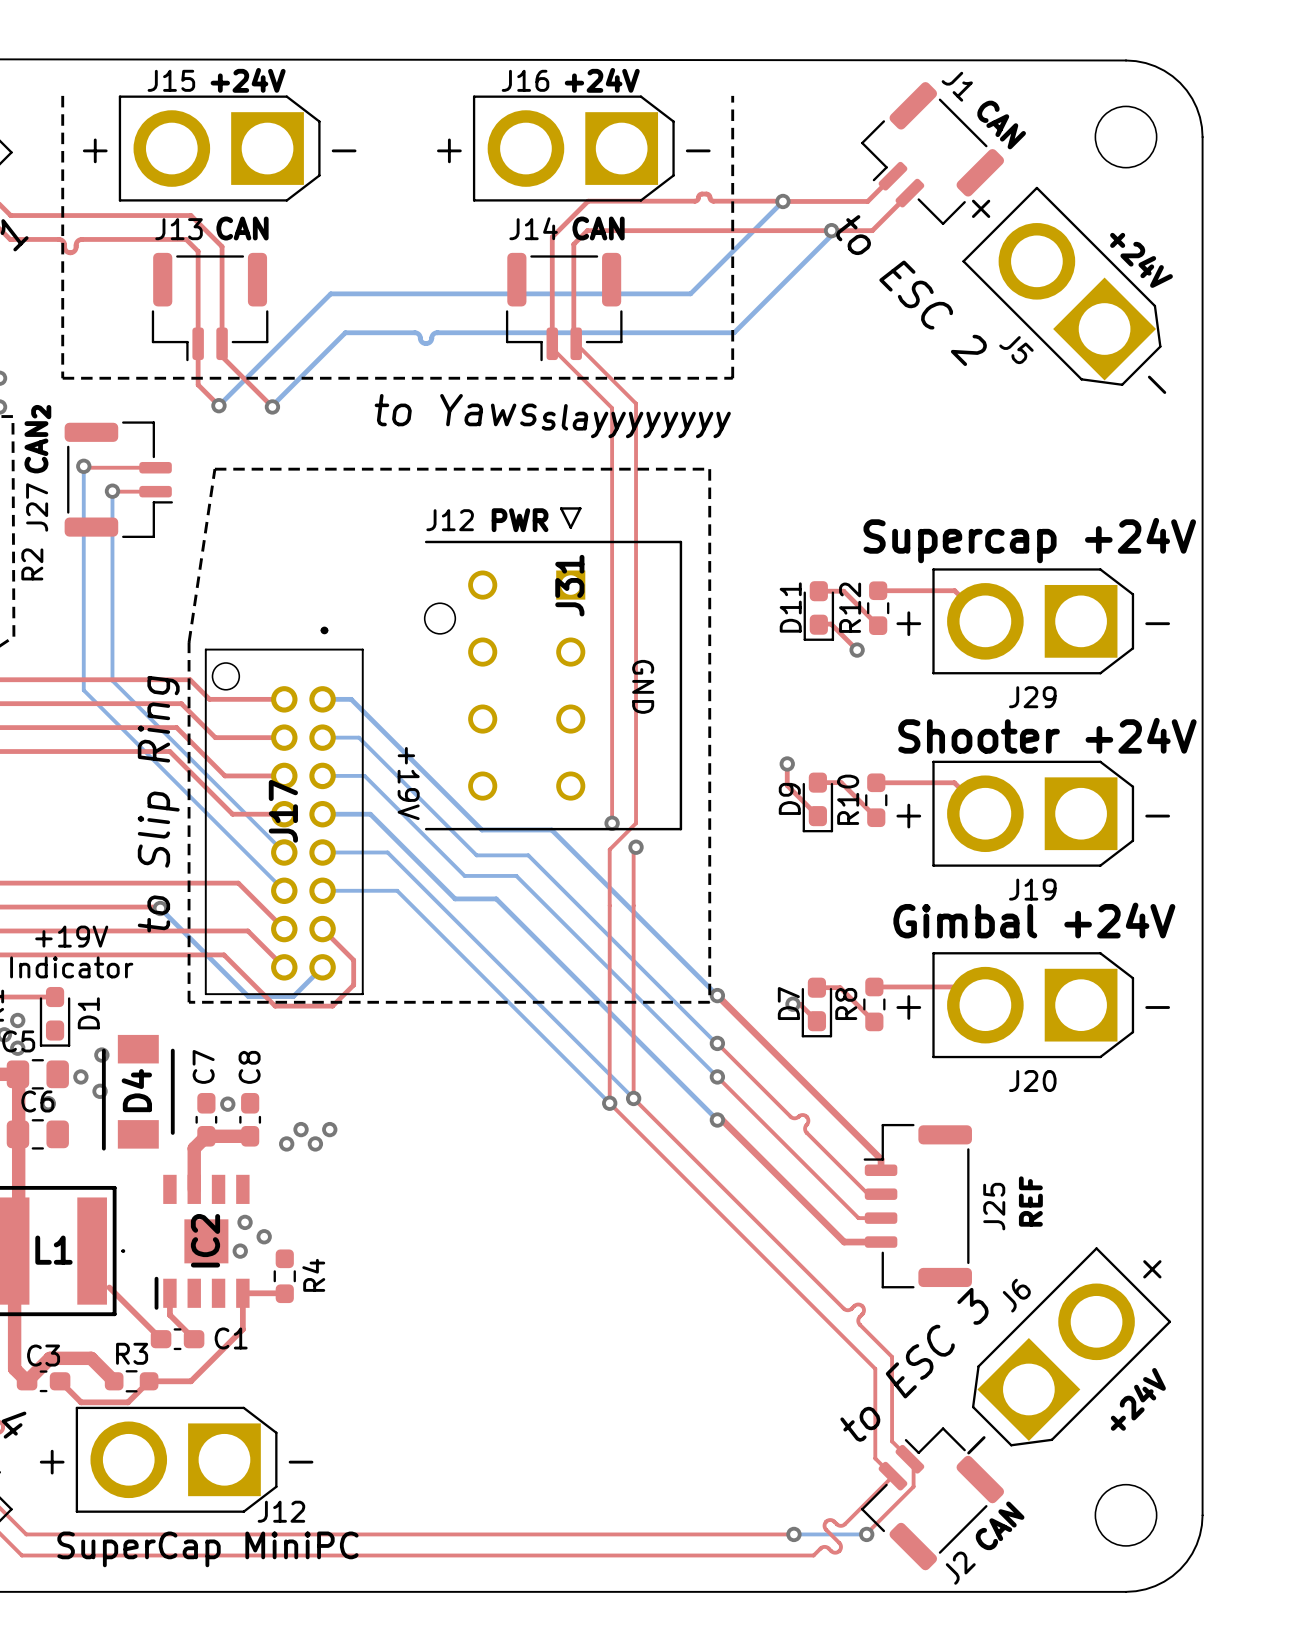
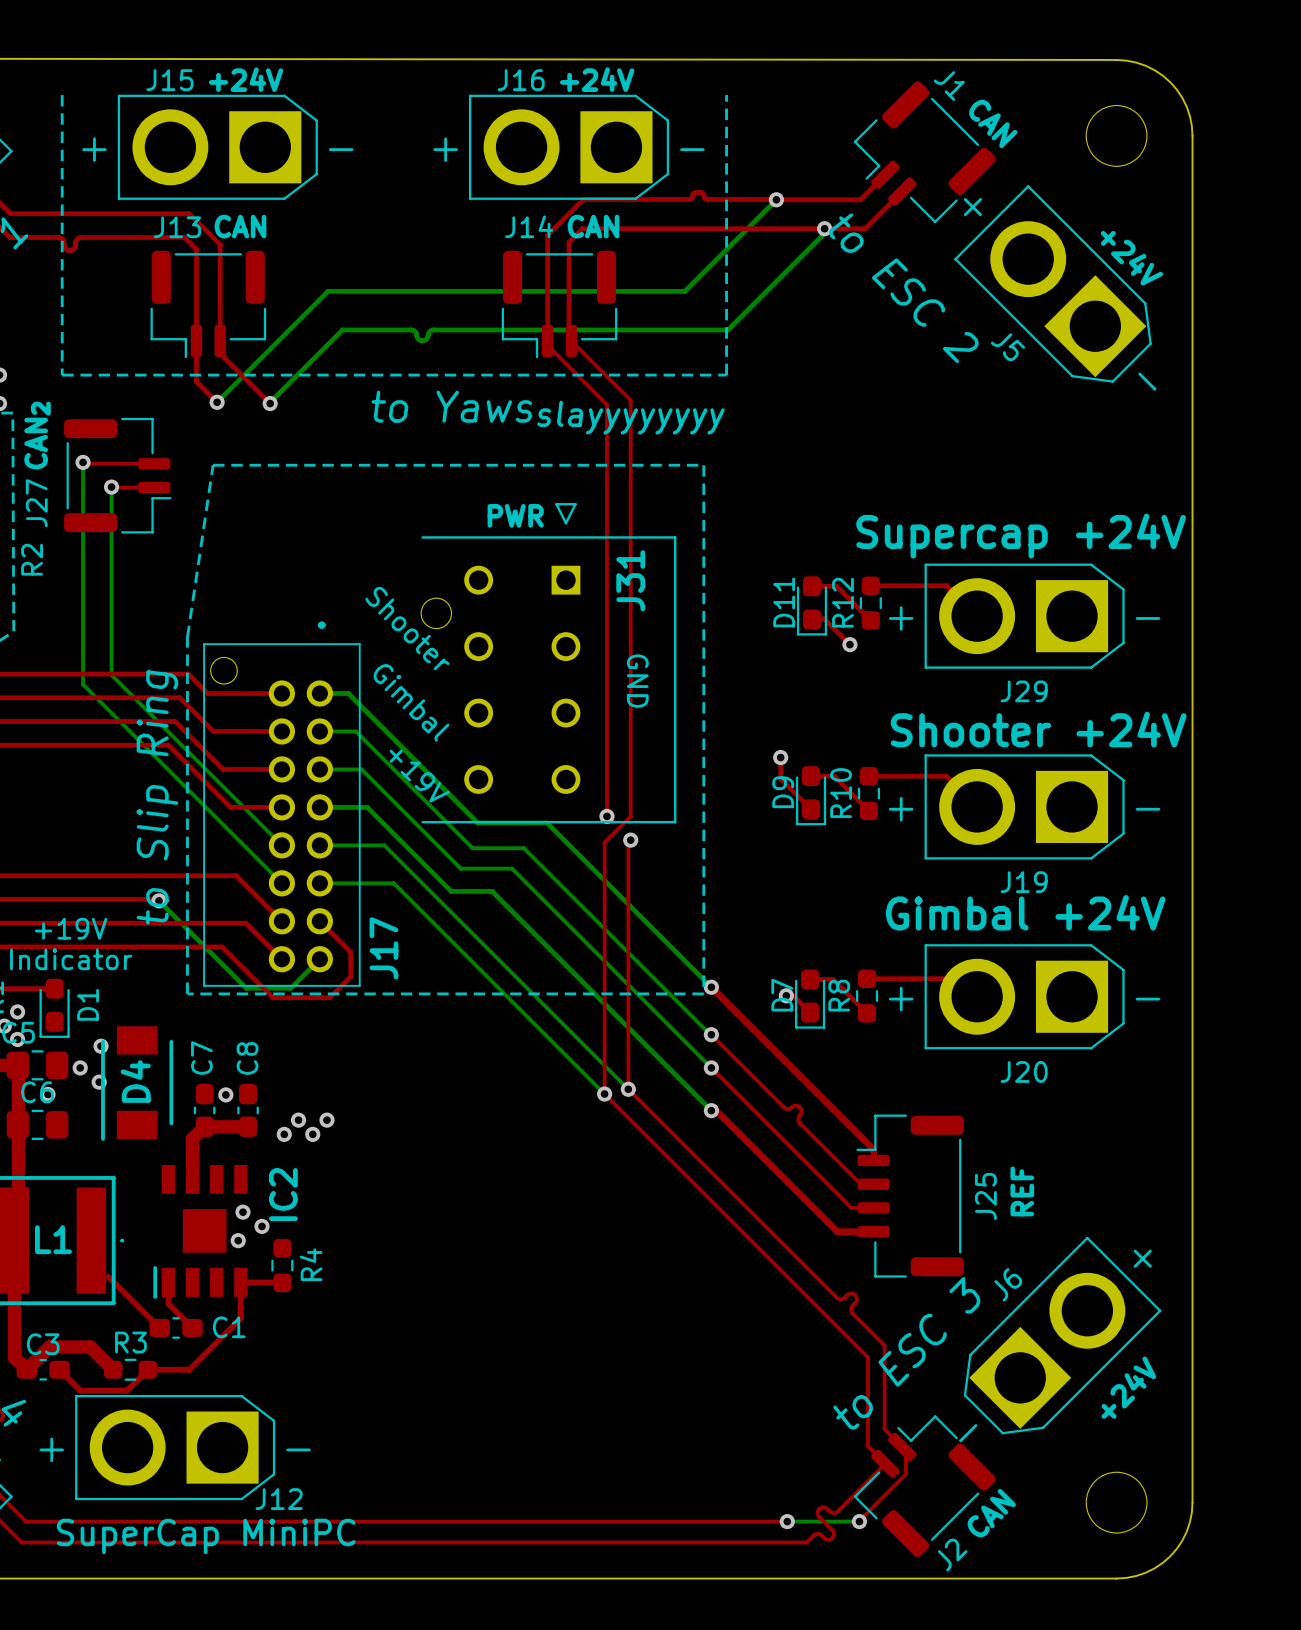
text: J12 (450, 520) -> none
J31 name position: J31 (569, 585) -> J31 (630, 580)
text: none -> Shooter (407, 628)
text: none -> Gimbal (411, 702)
text rotation: 0° (408, 783) -> 45° counterclockwise (419, 776)
J17 name position: J17 (283, 811) -> J17 (383, 948)
IC2 name position: IC2 (205, 1240) -> IC2 (283, 1194)

